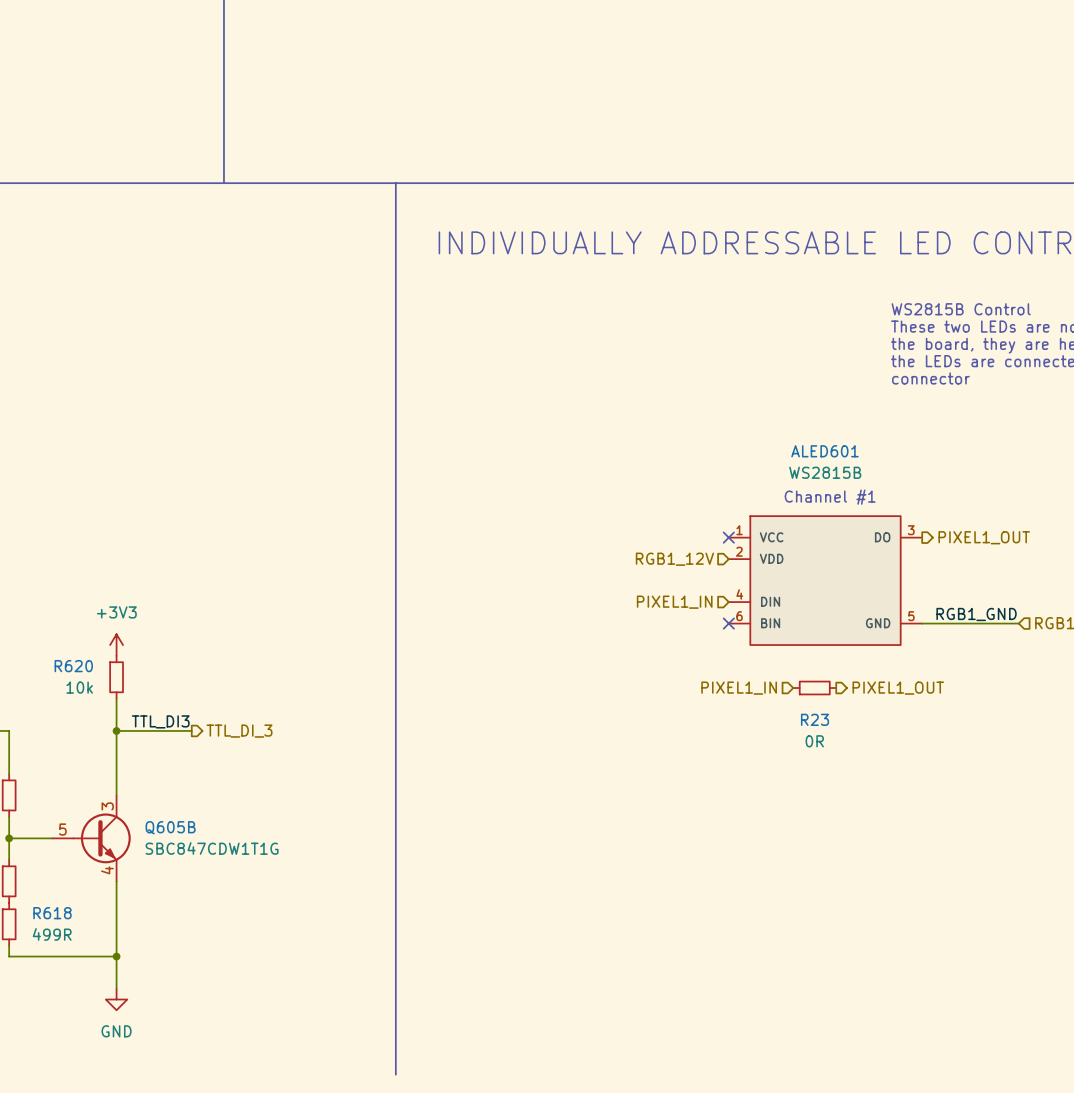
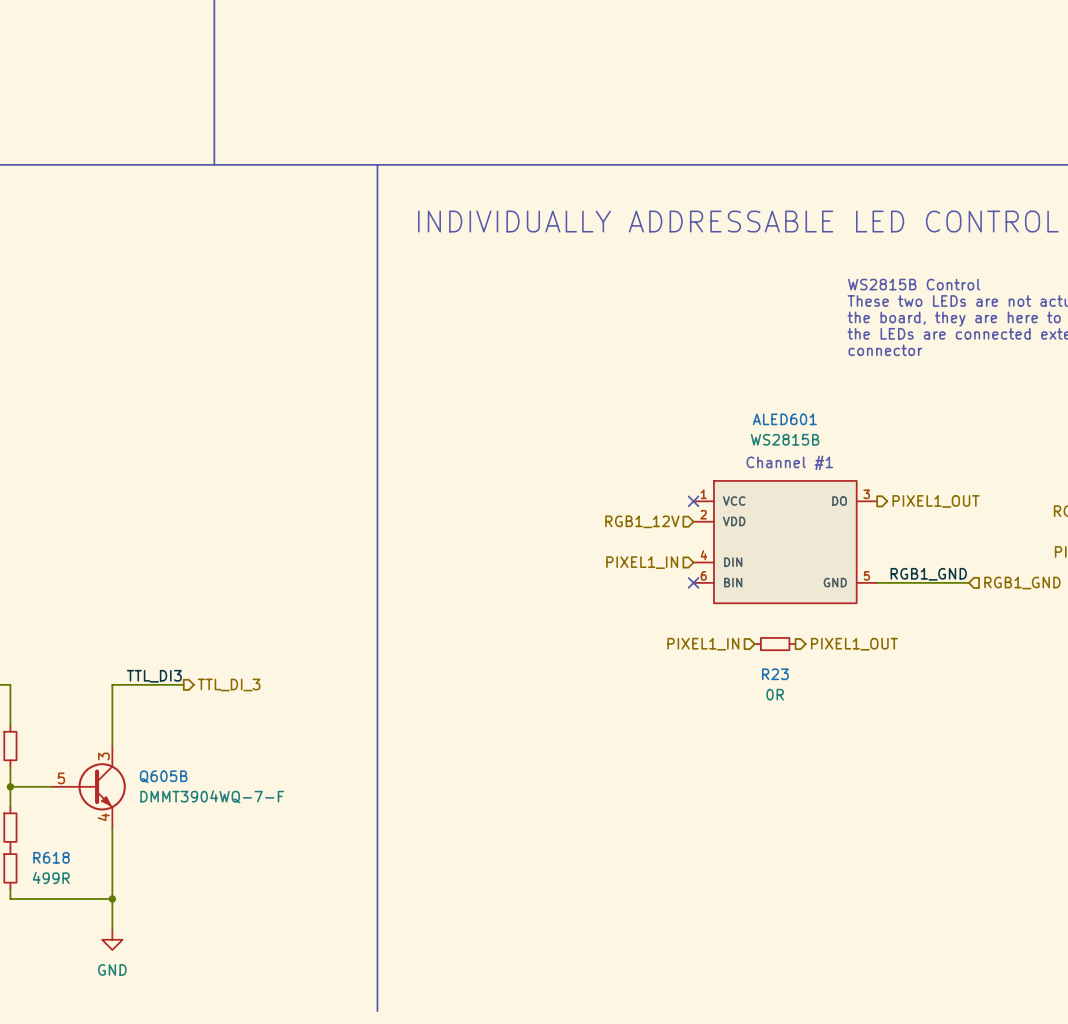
power symbol: +3V3 (116, 645) -> none
R620: 10k (116, 677) -> none
wire: (116, 698) (116, 730) -> none
junction: (116, 730) -> none
Q605B value: SBC847CDW1T1G (212, 848) -> DMMT3904WQ-7-F (212, 796)

